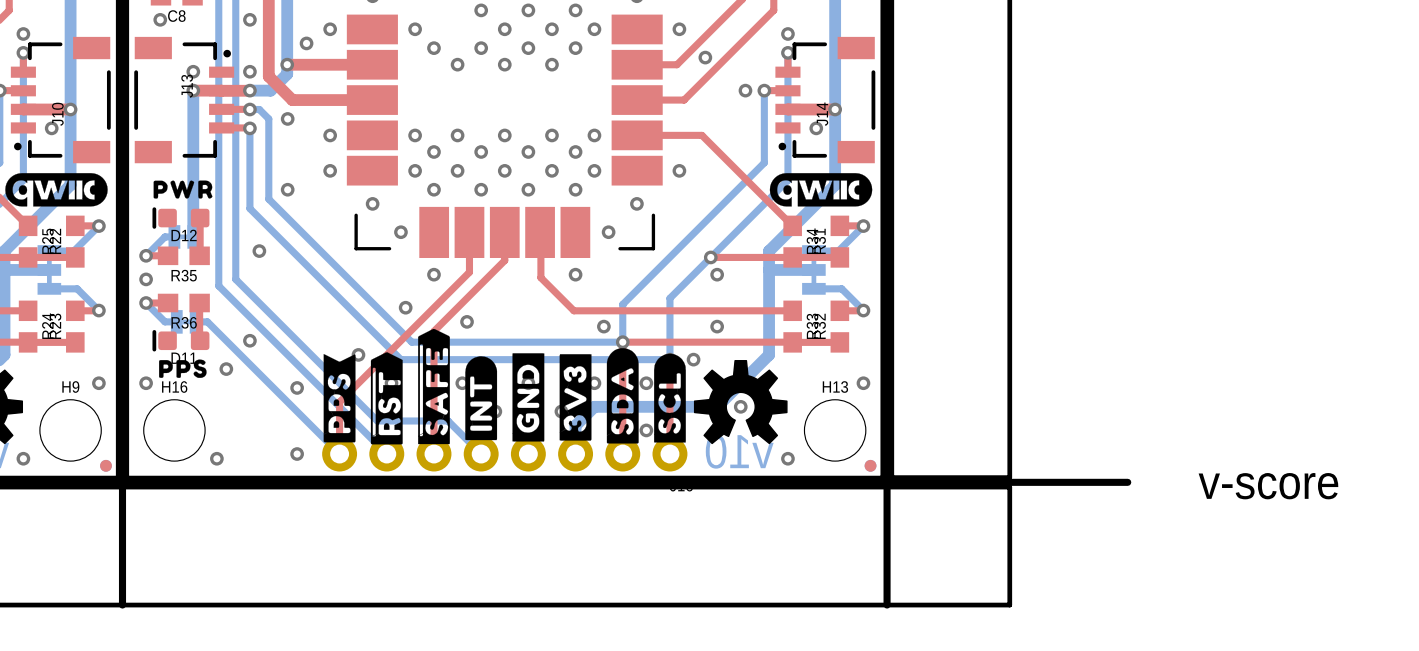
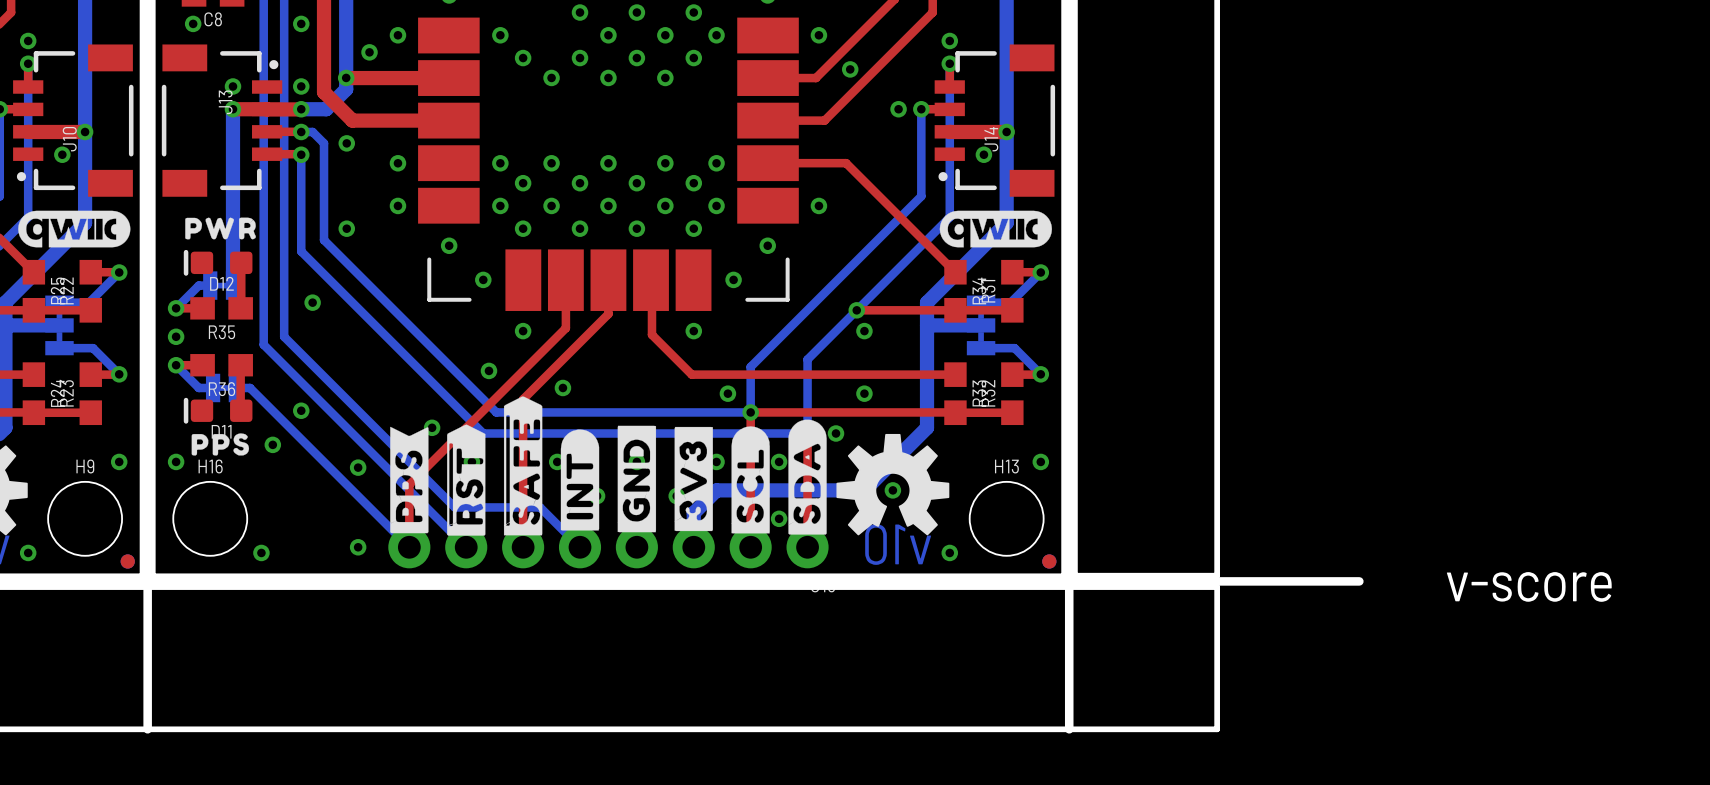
drawing shape: [5, 173, 108, 207] -> [18, 210, 131, 248]
drawing shape: [769, 173, 873, 207] -> [939, 210, 1052, 248]
drawing position: (622, 395) -> (807, 477)
drawing position: (669, 398) -> (750, 479)

